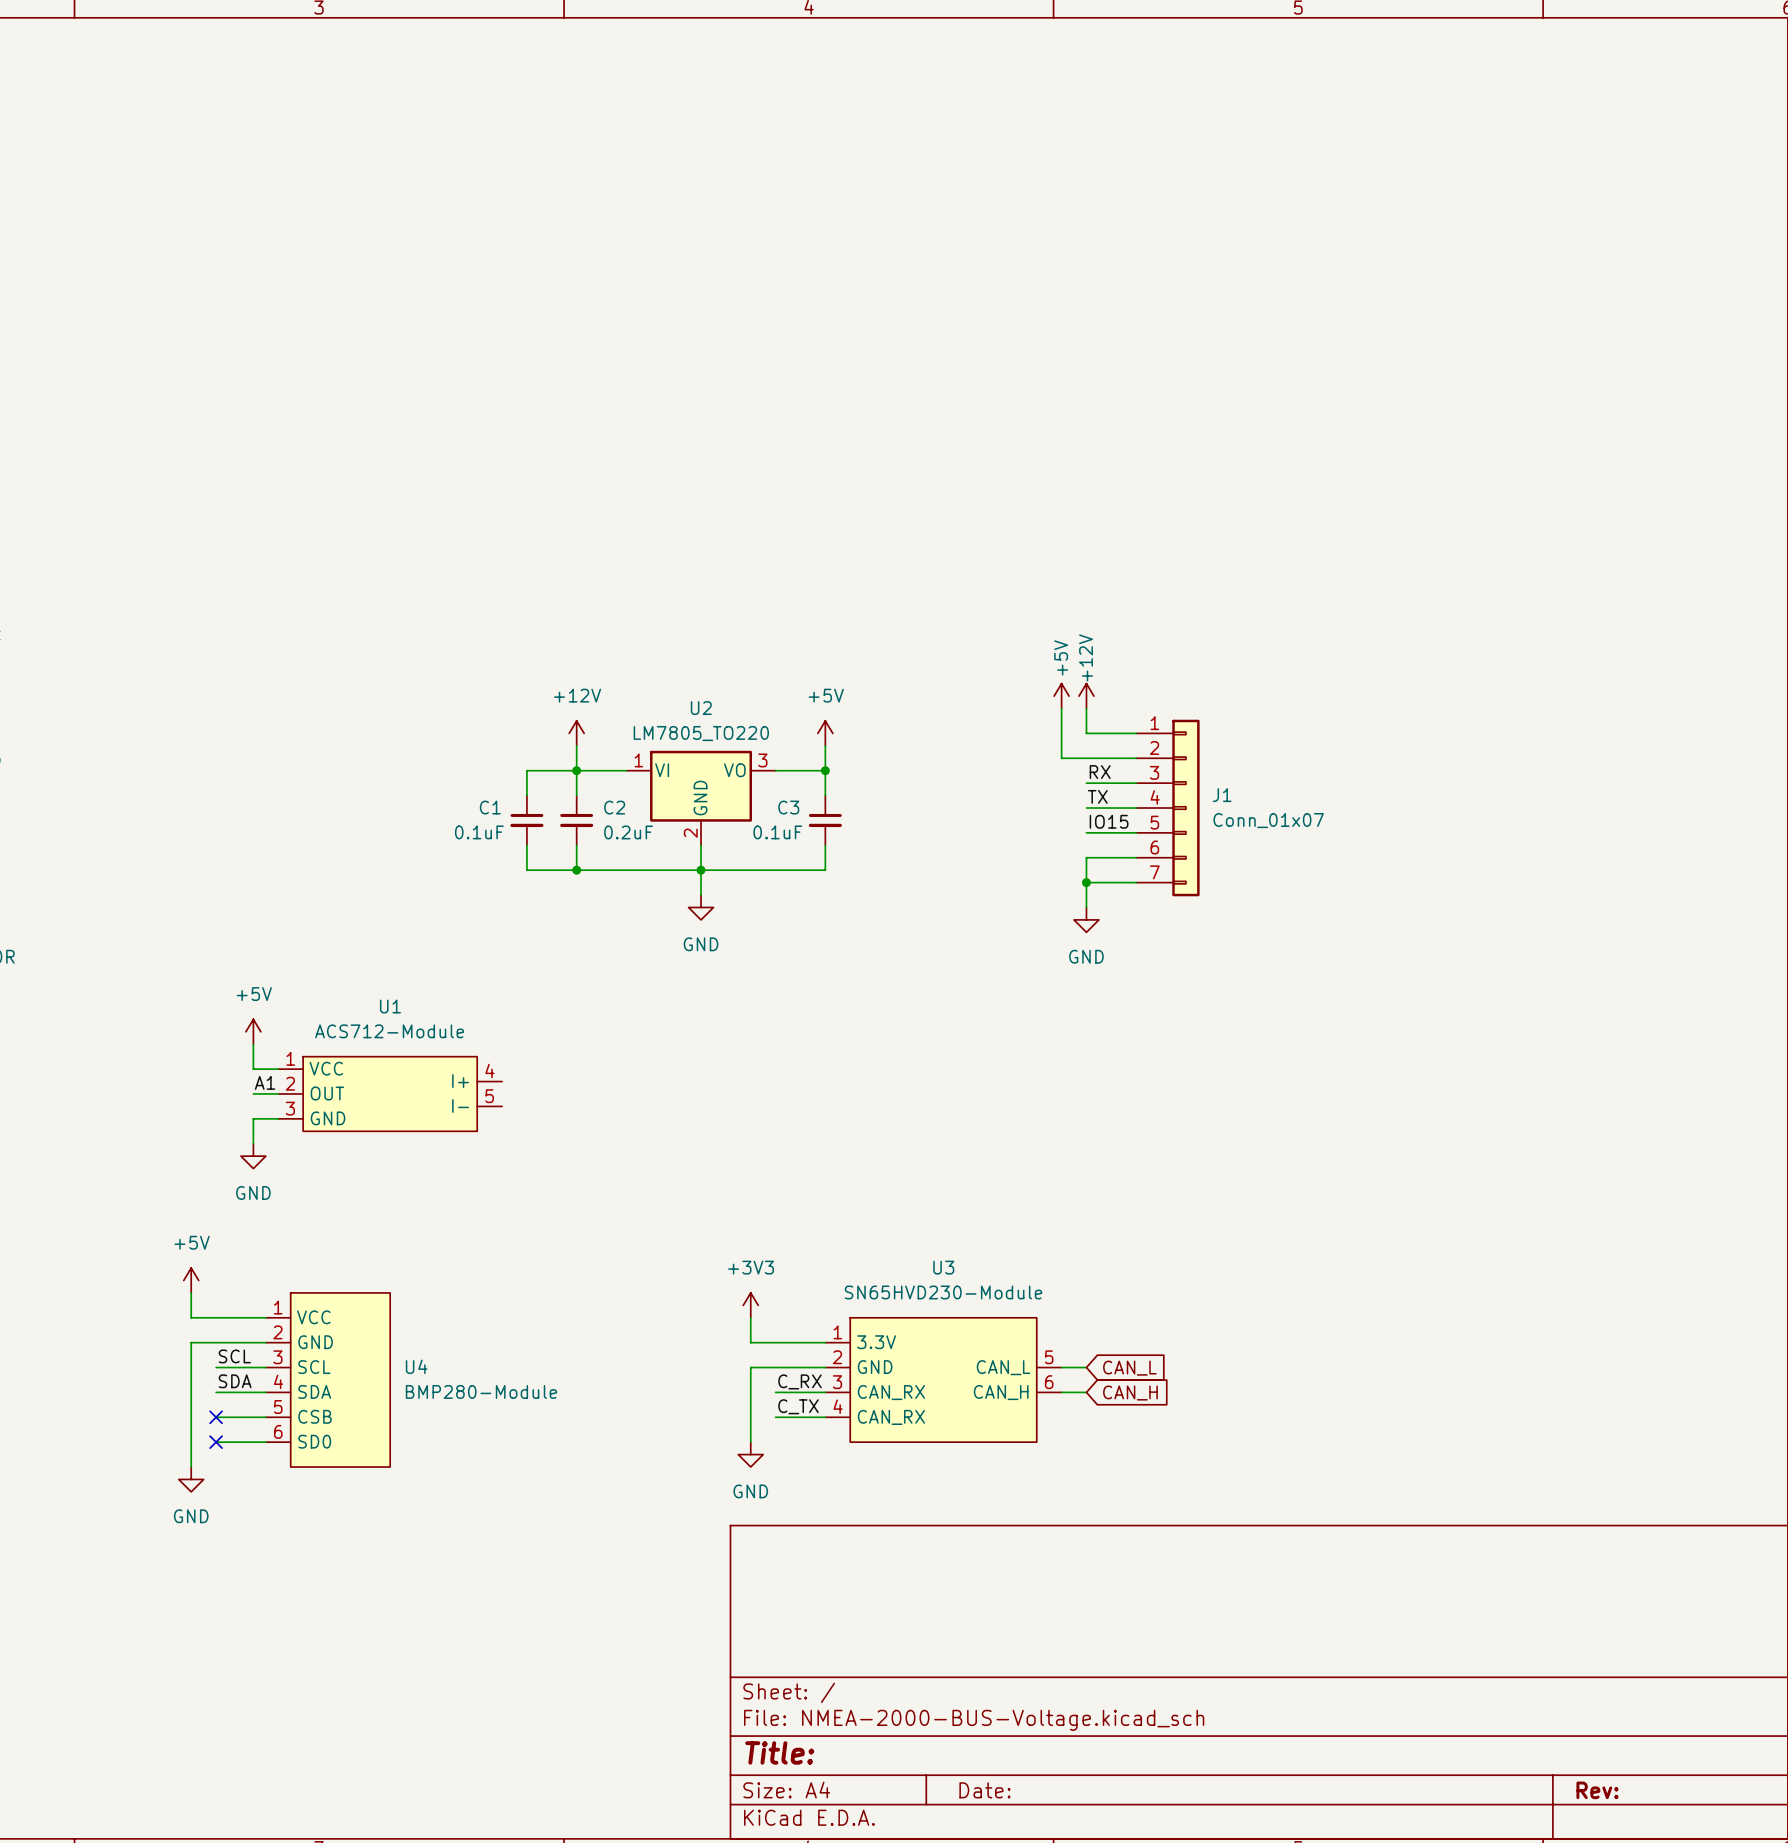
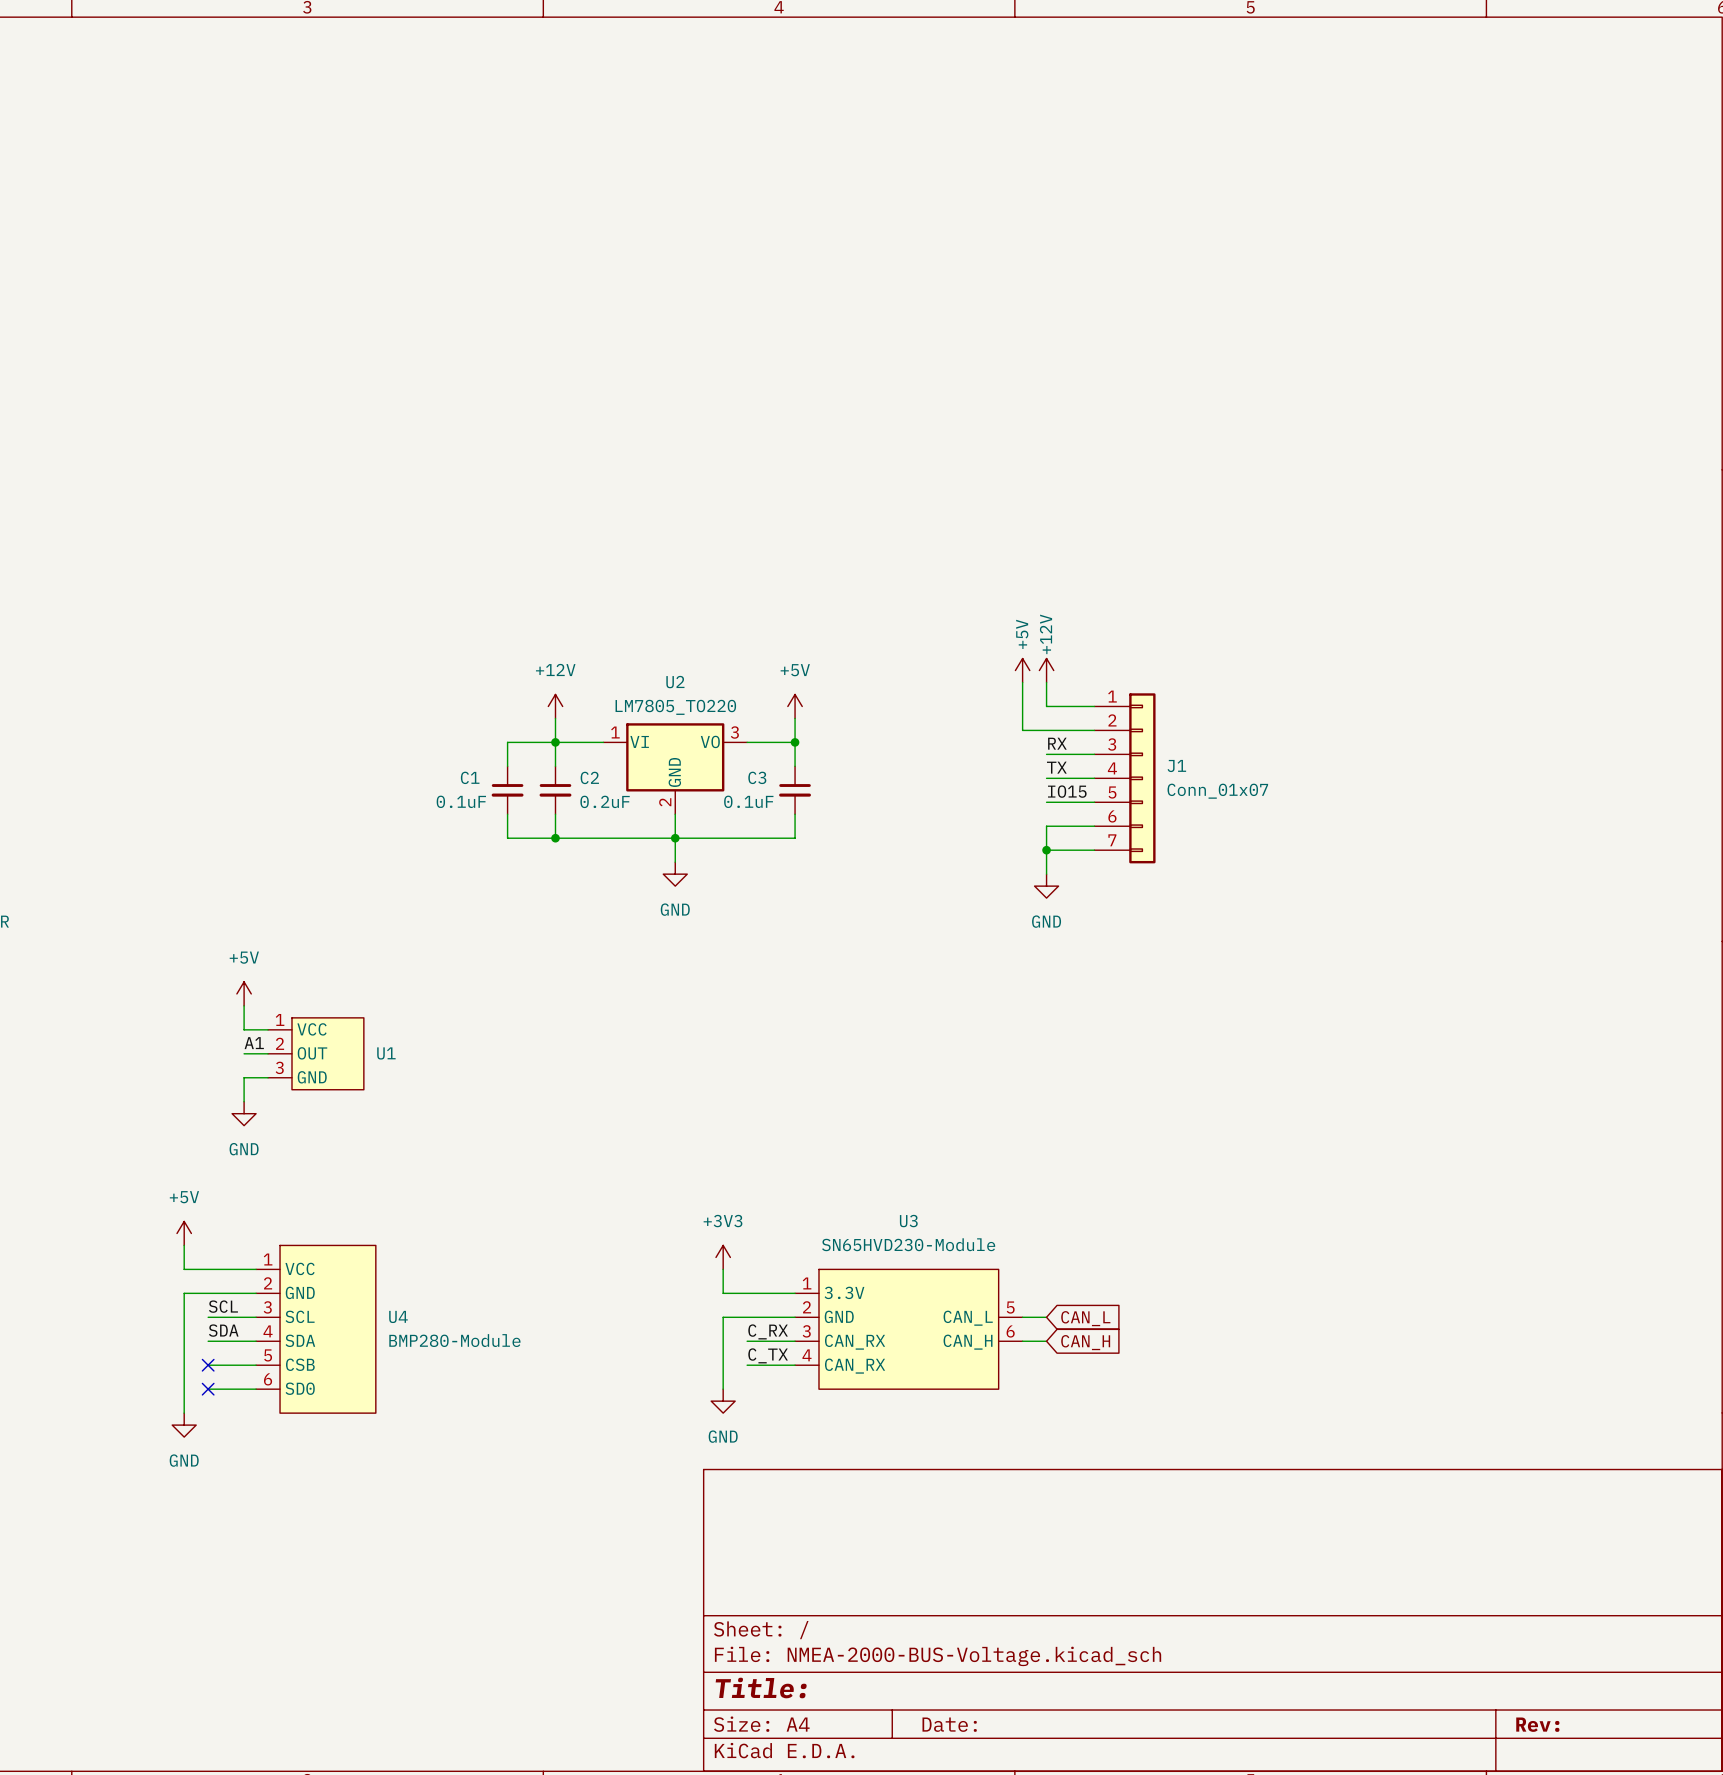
U1 name position: U1 (390, 1006) -> U1 (386, 1053)
U1 value: ACS712-Module (389, 1031) -> none
U1 symbol: [278, 1056, 503, 1132] -> [268, 1017, 364, 1090]

